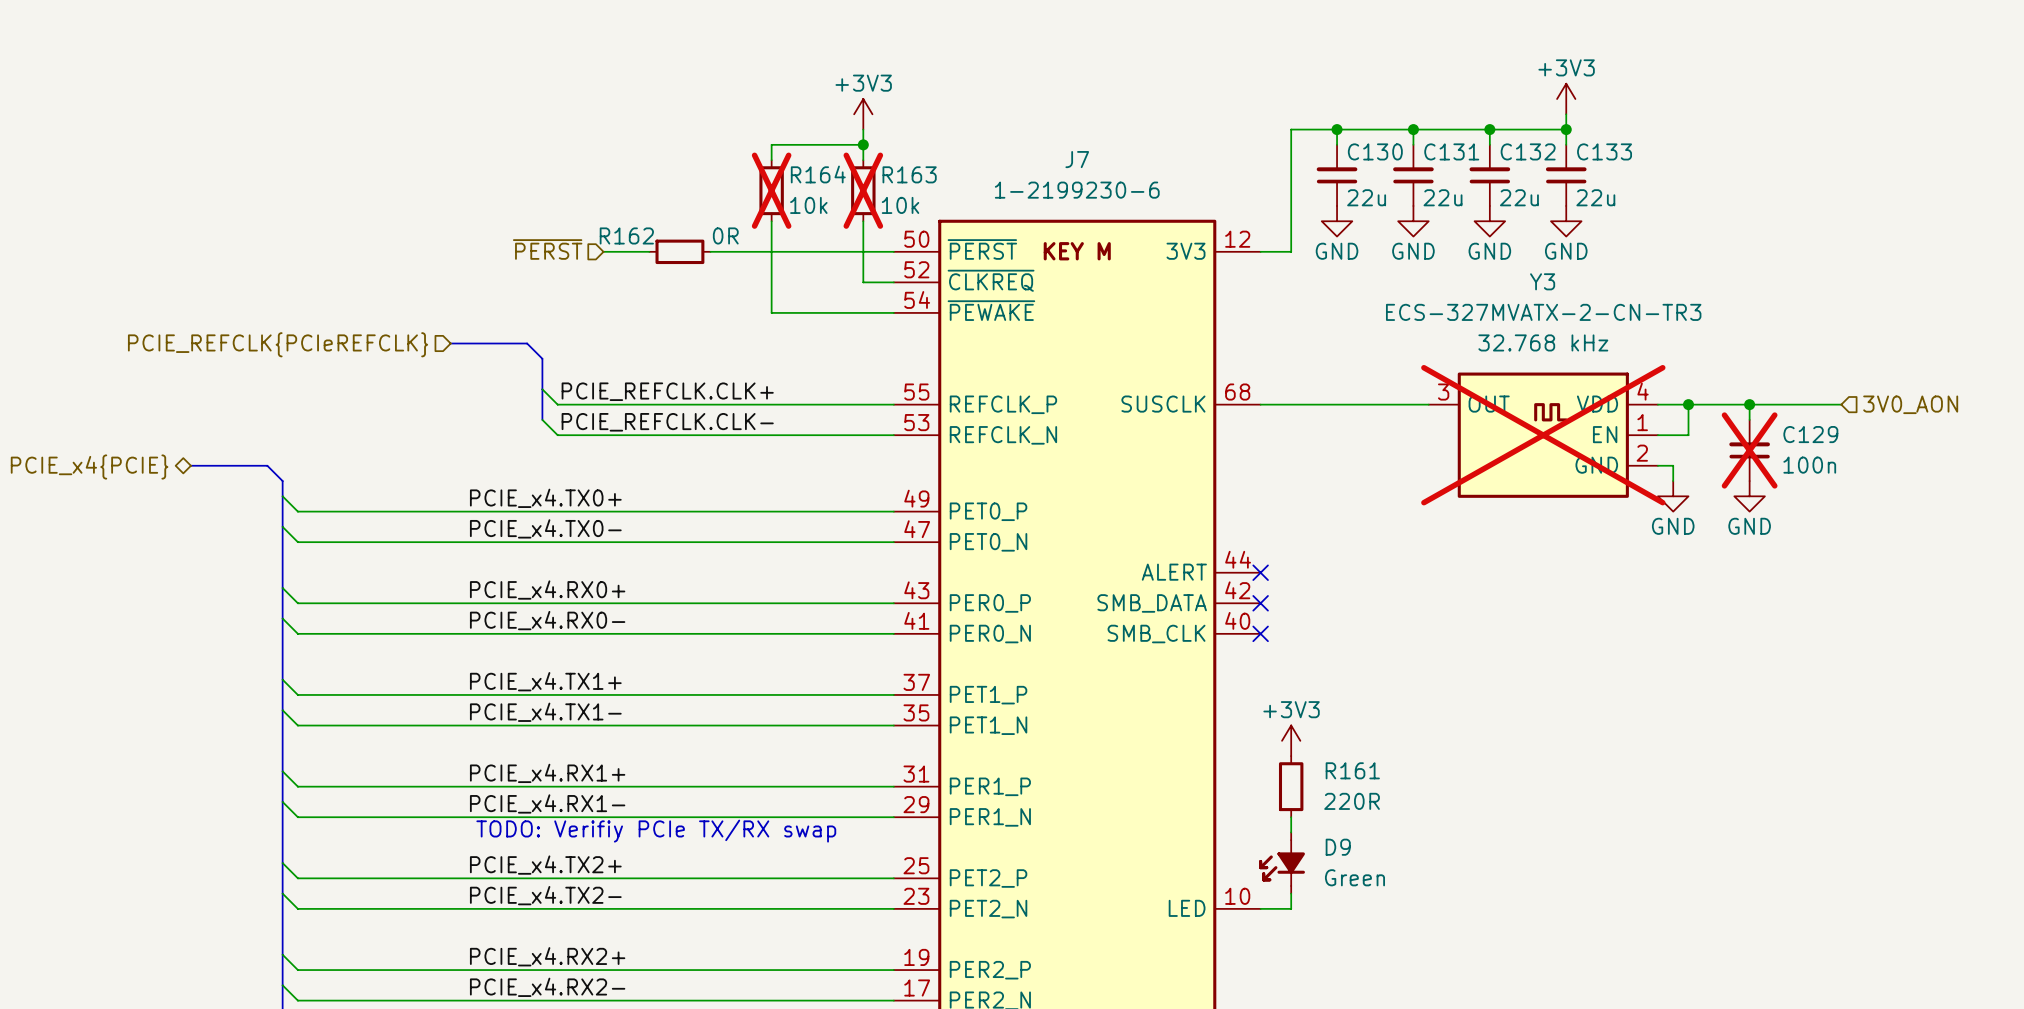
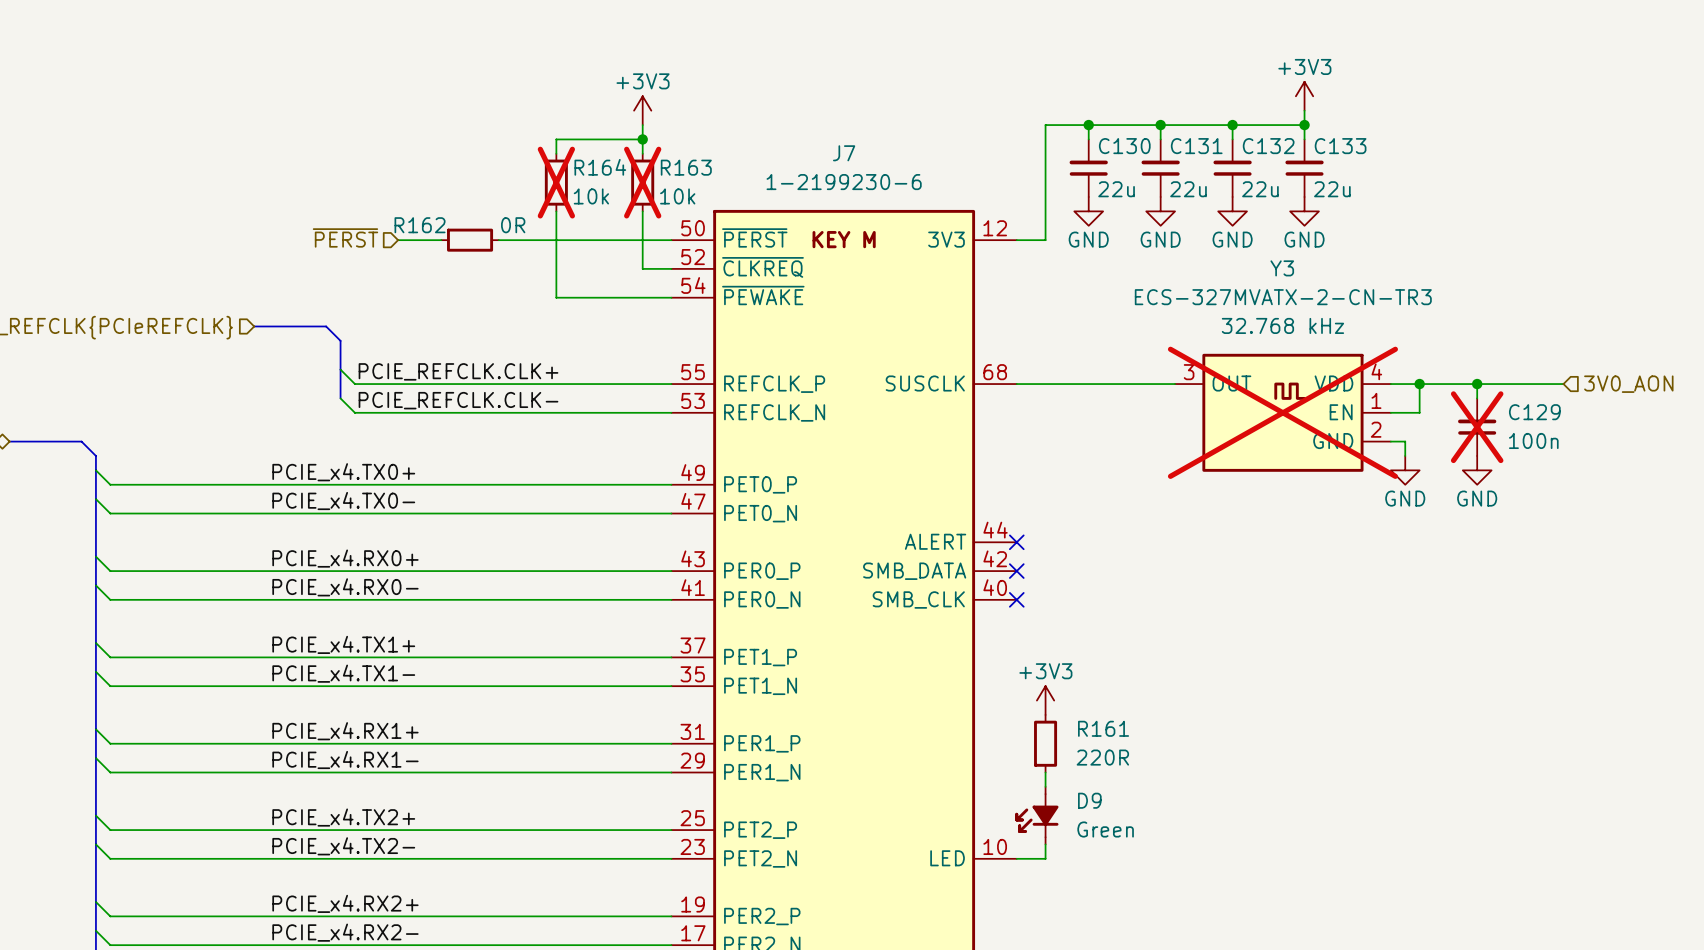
text: TODO: Verifiy PCIe TX/RX swap (656, 831) -> none

